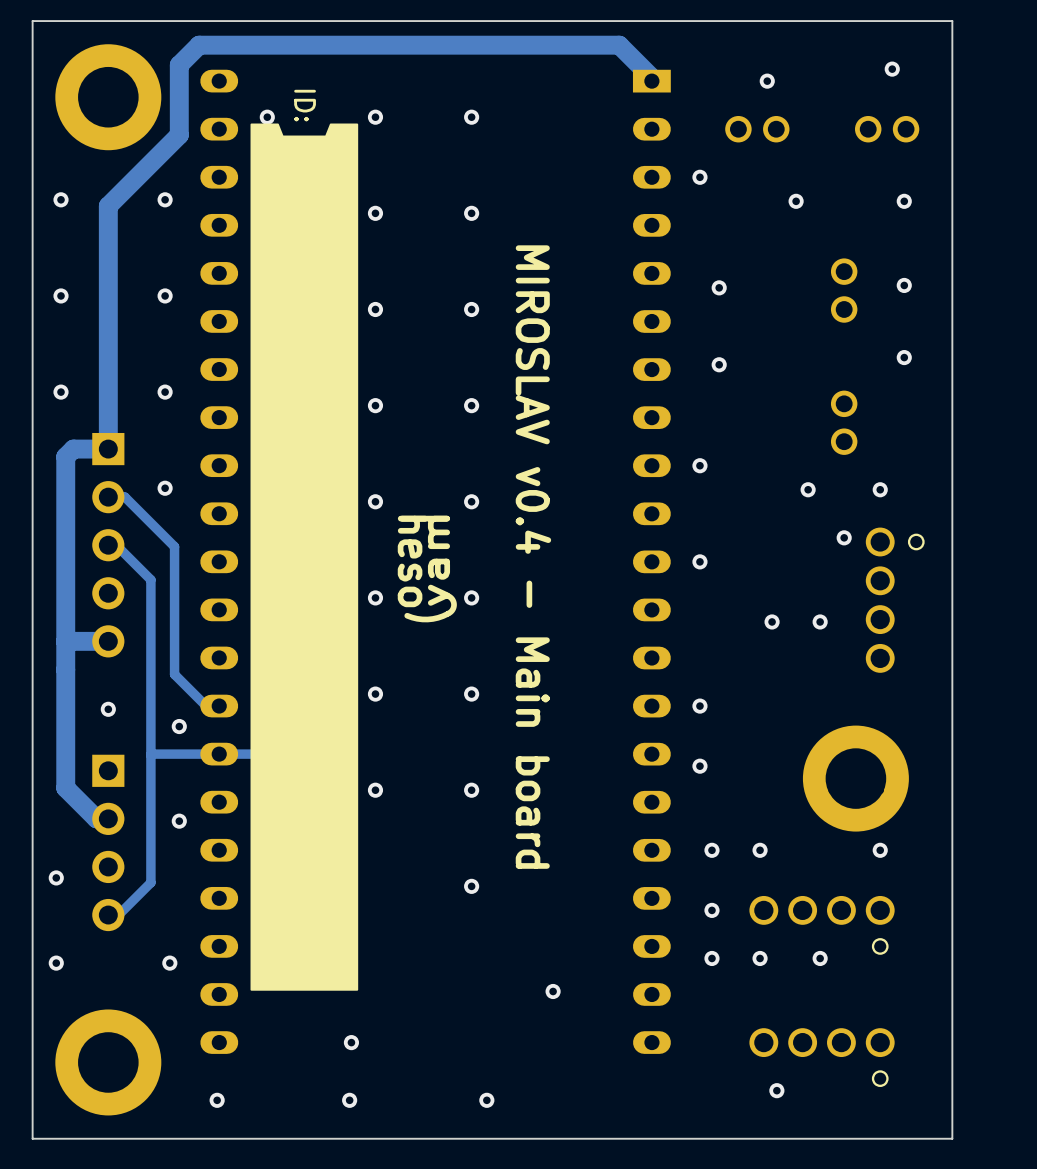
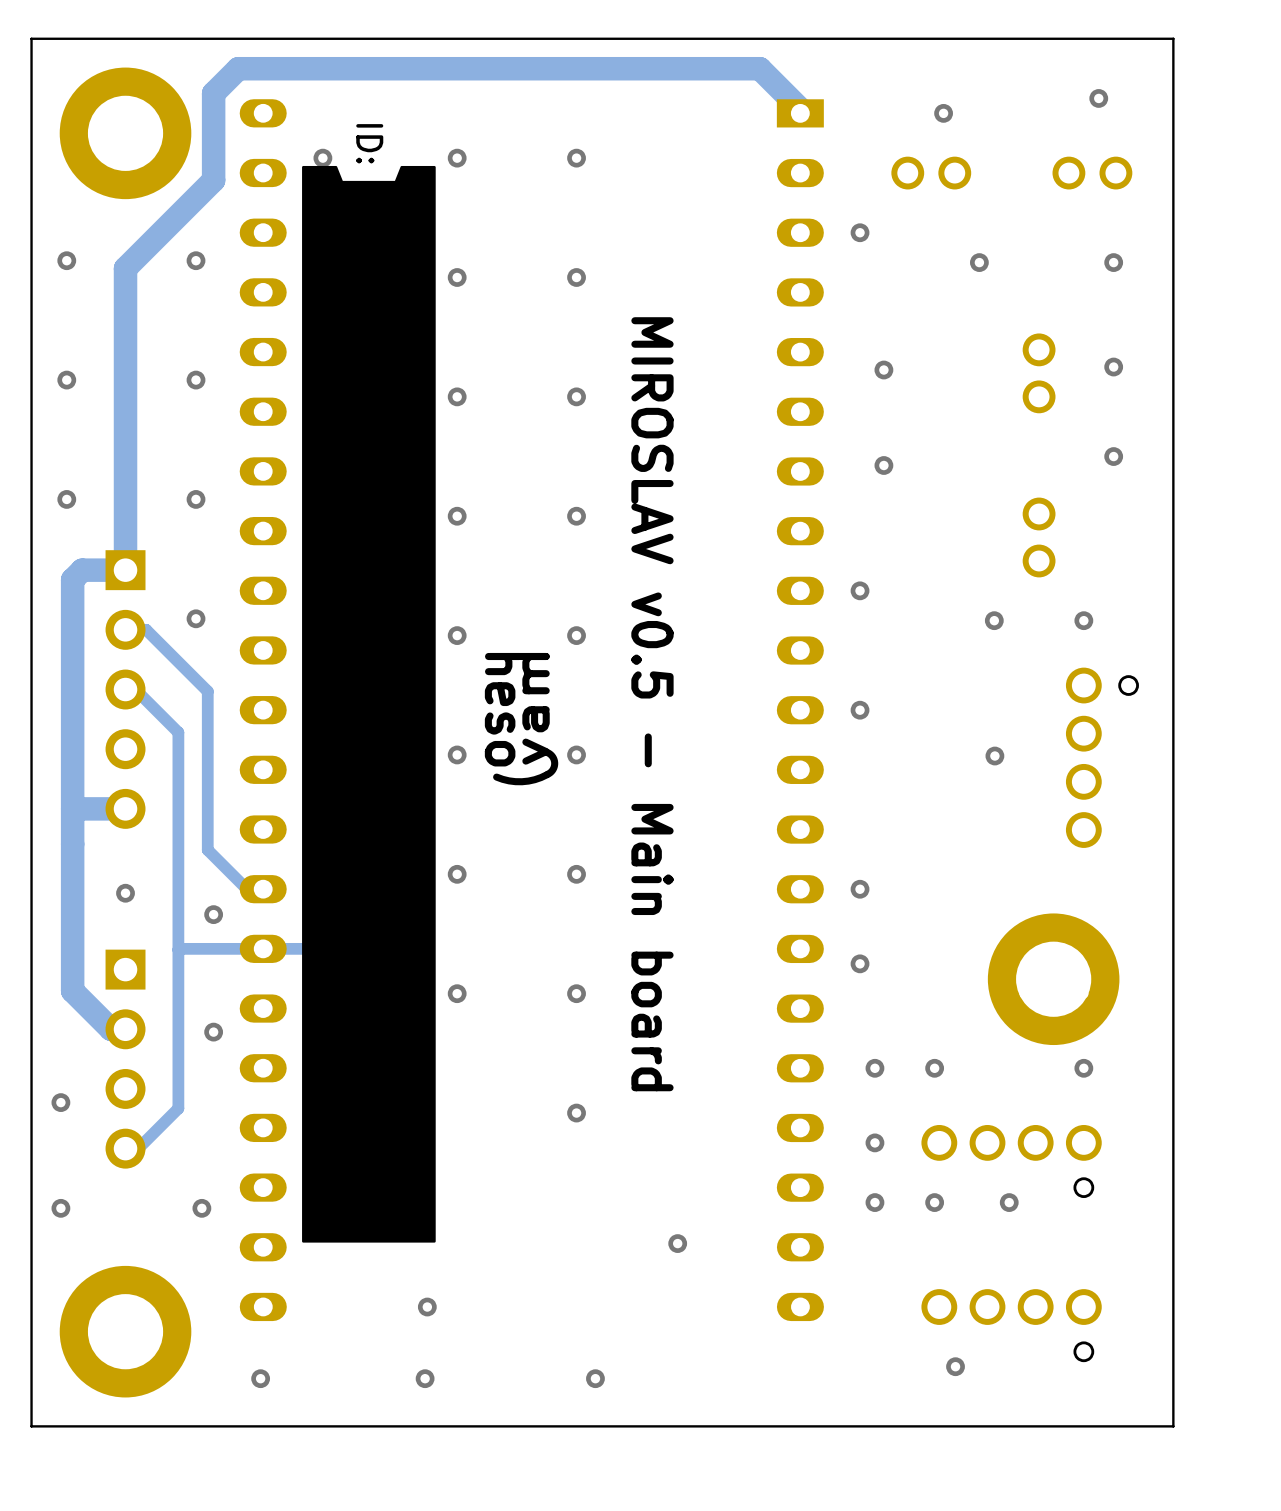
via: (844, 537) -> none
text: MIROSLAV v0.4 - Main board (533, 557) -> MIROSLAV v0.5 - Main board (652, 704)
via: none -> (994, 756)
via: (772, 621) -> none
via: (820, 621) -> none

